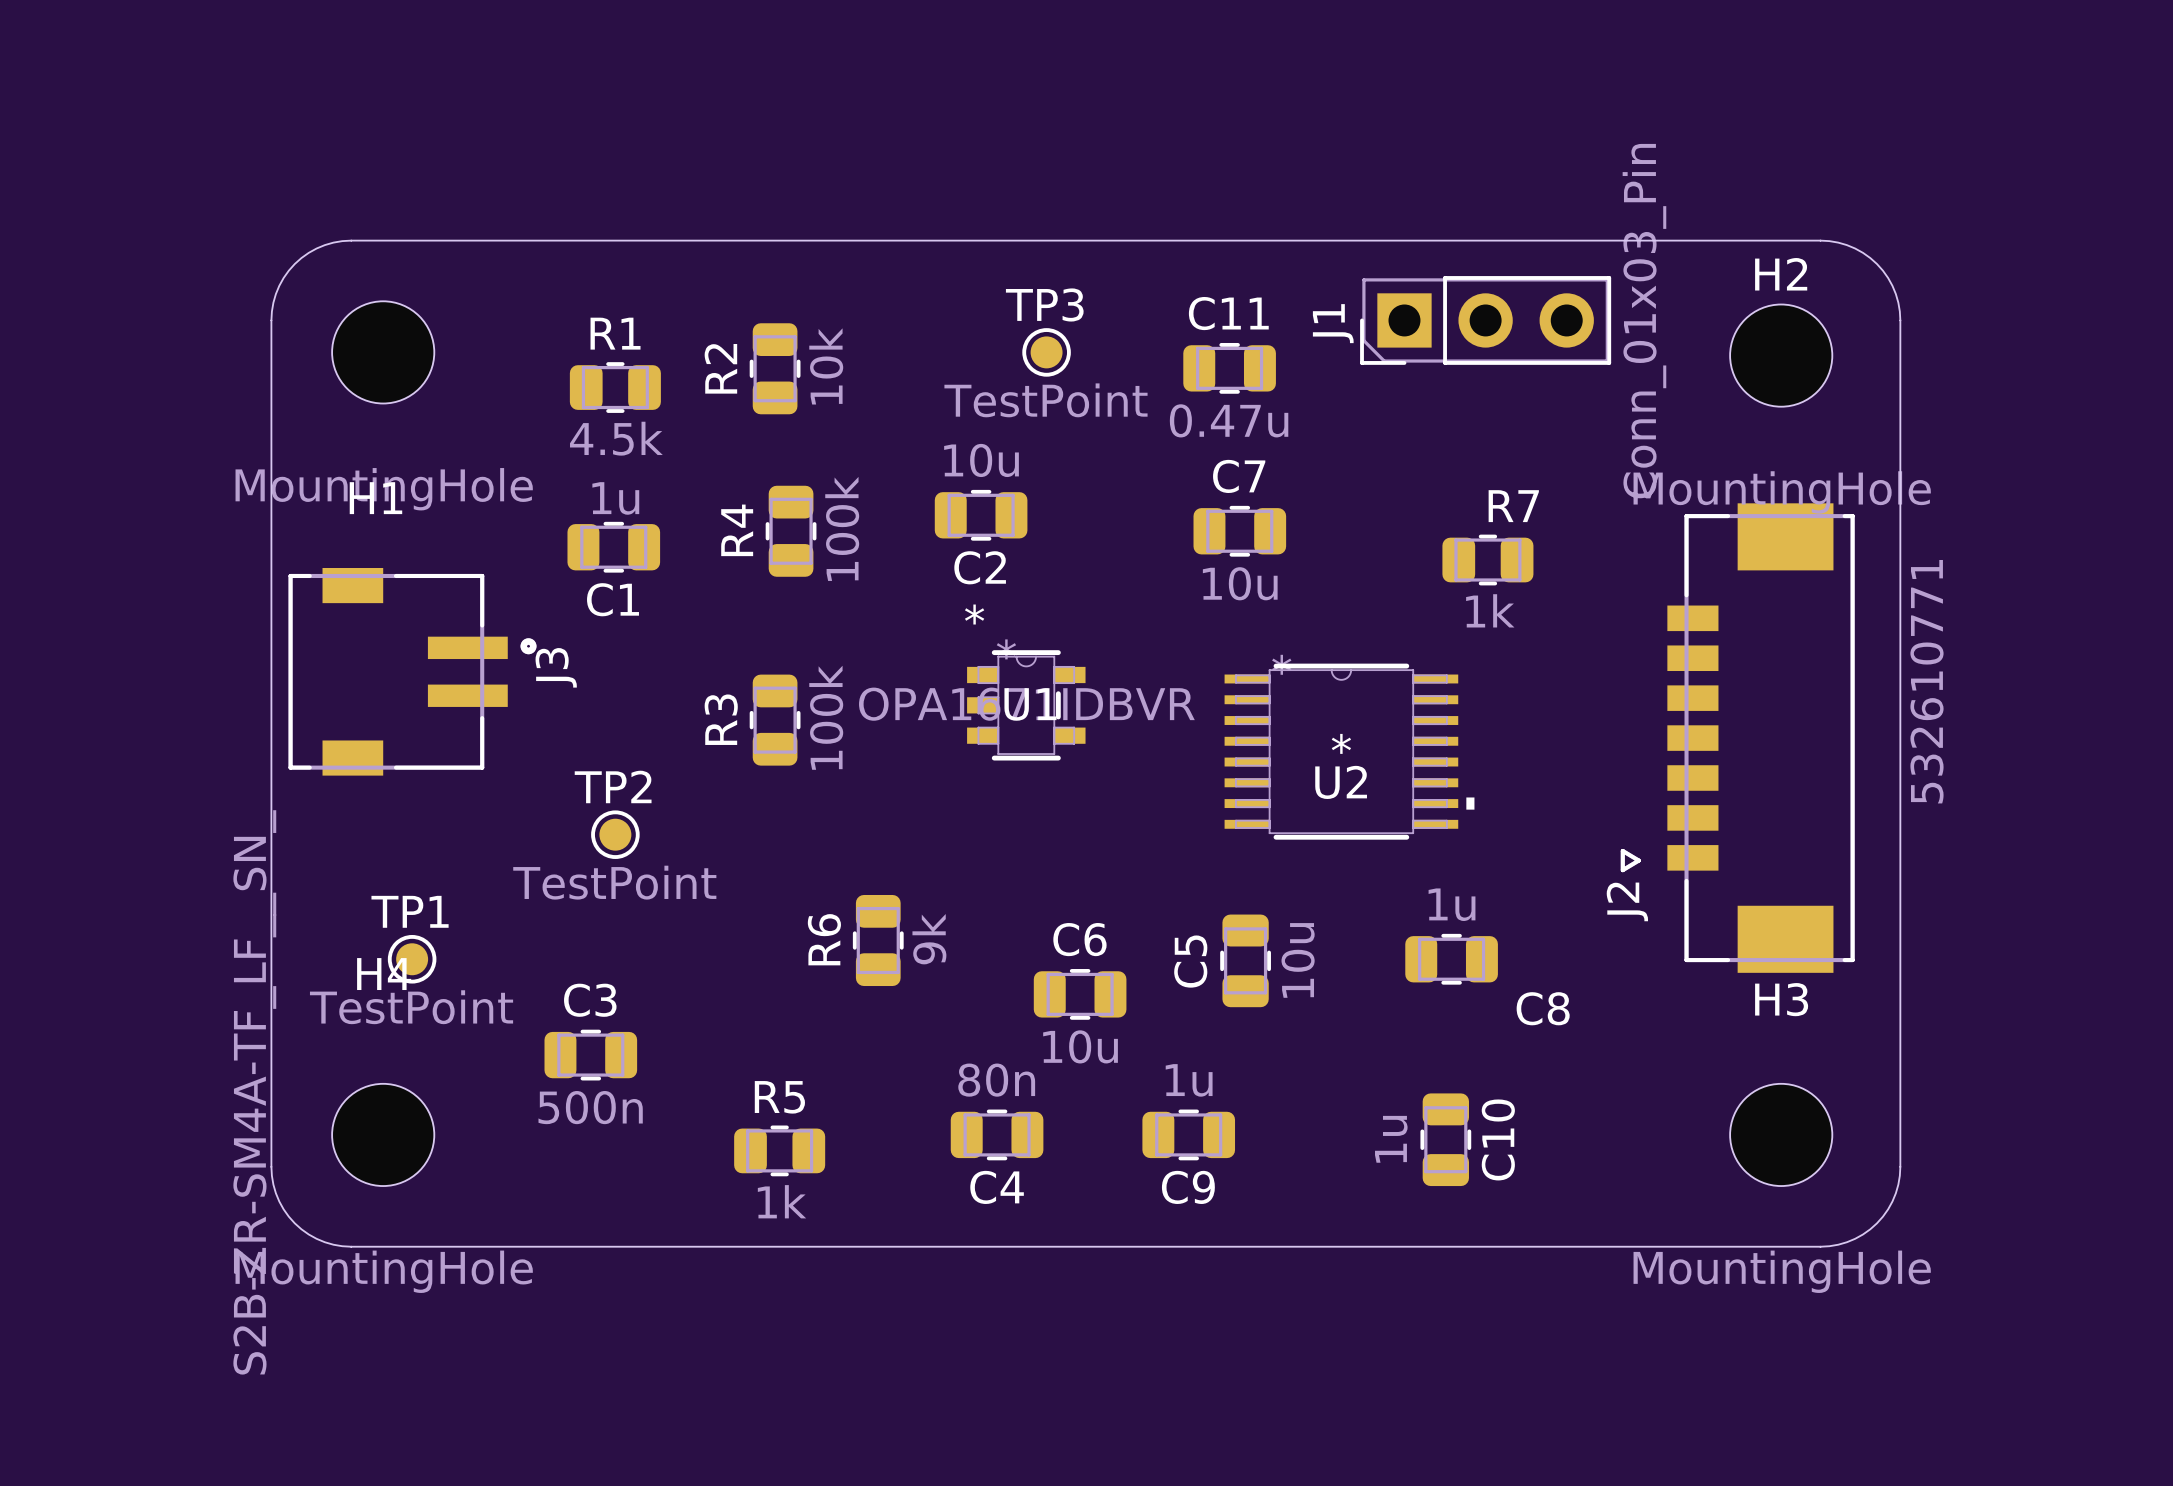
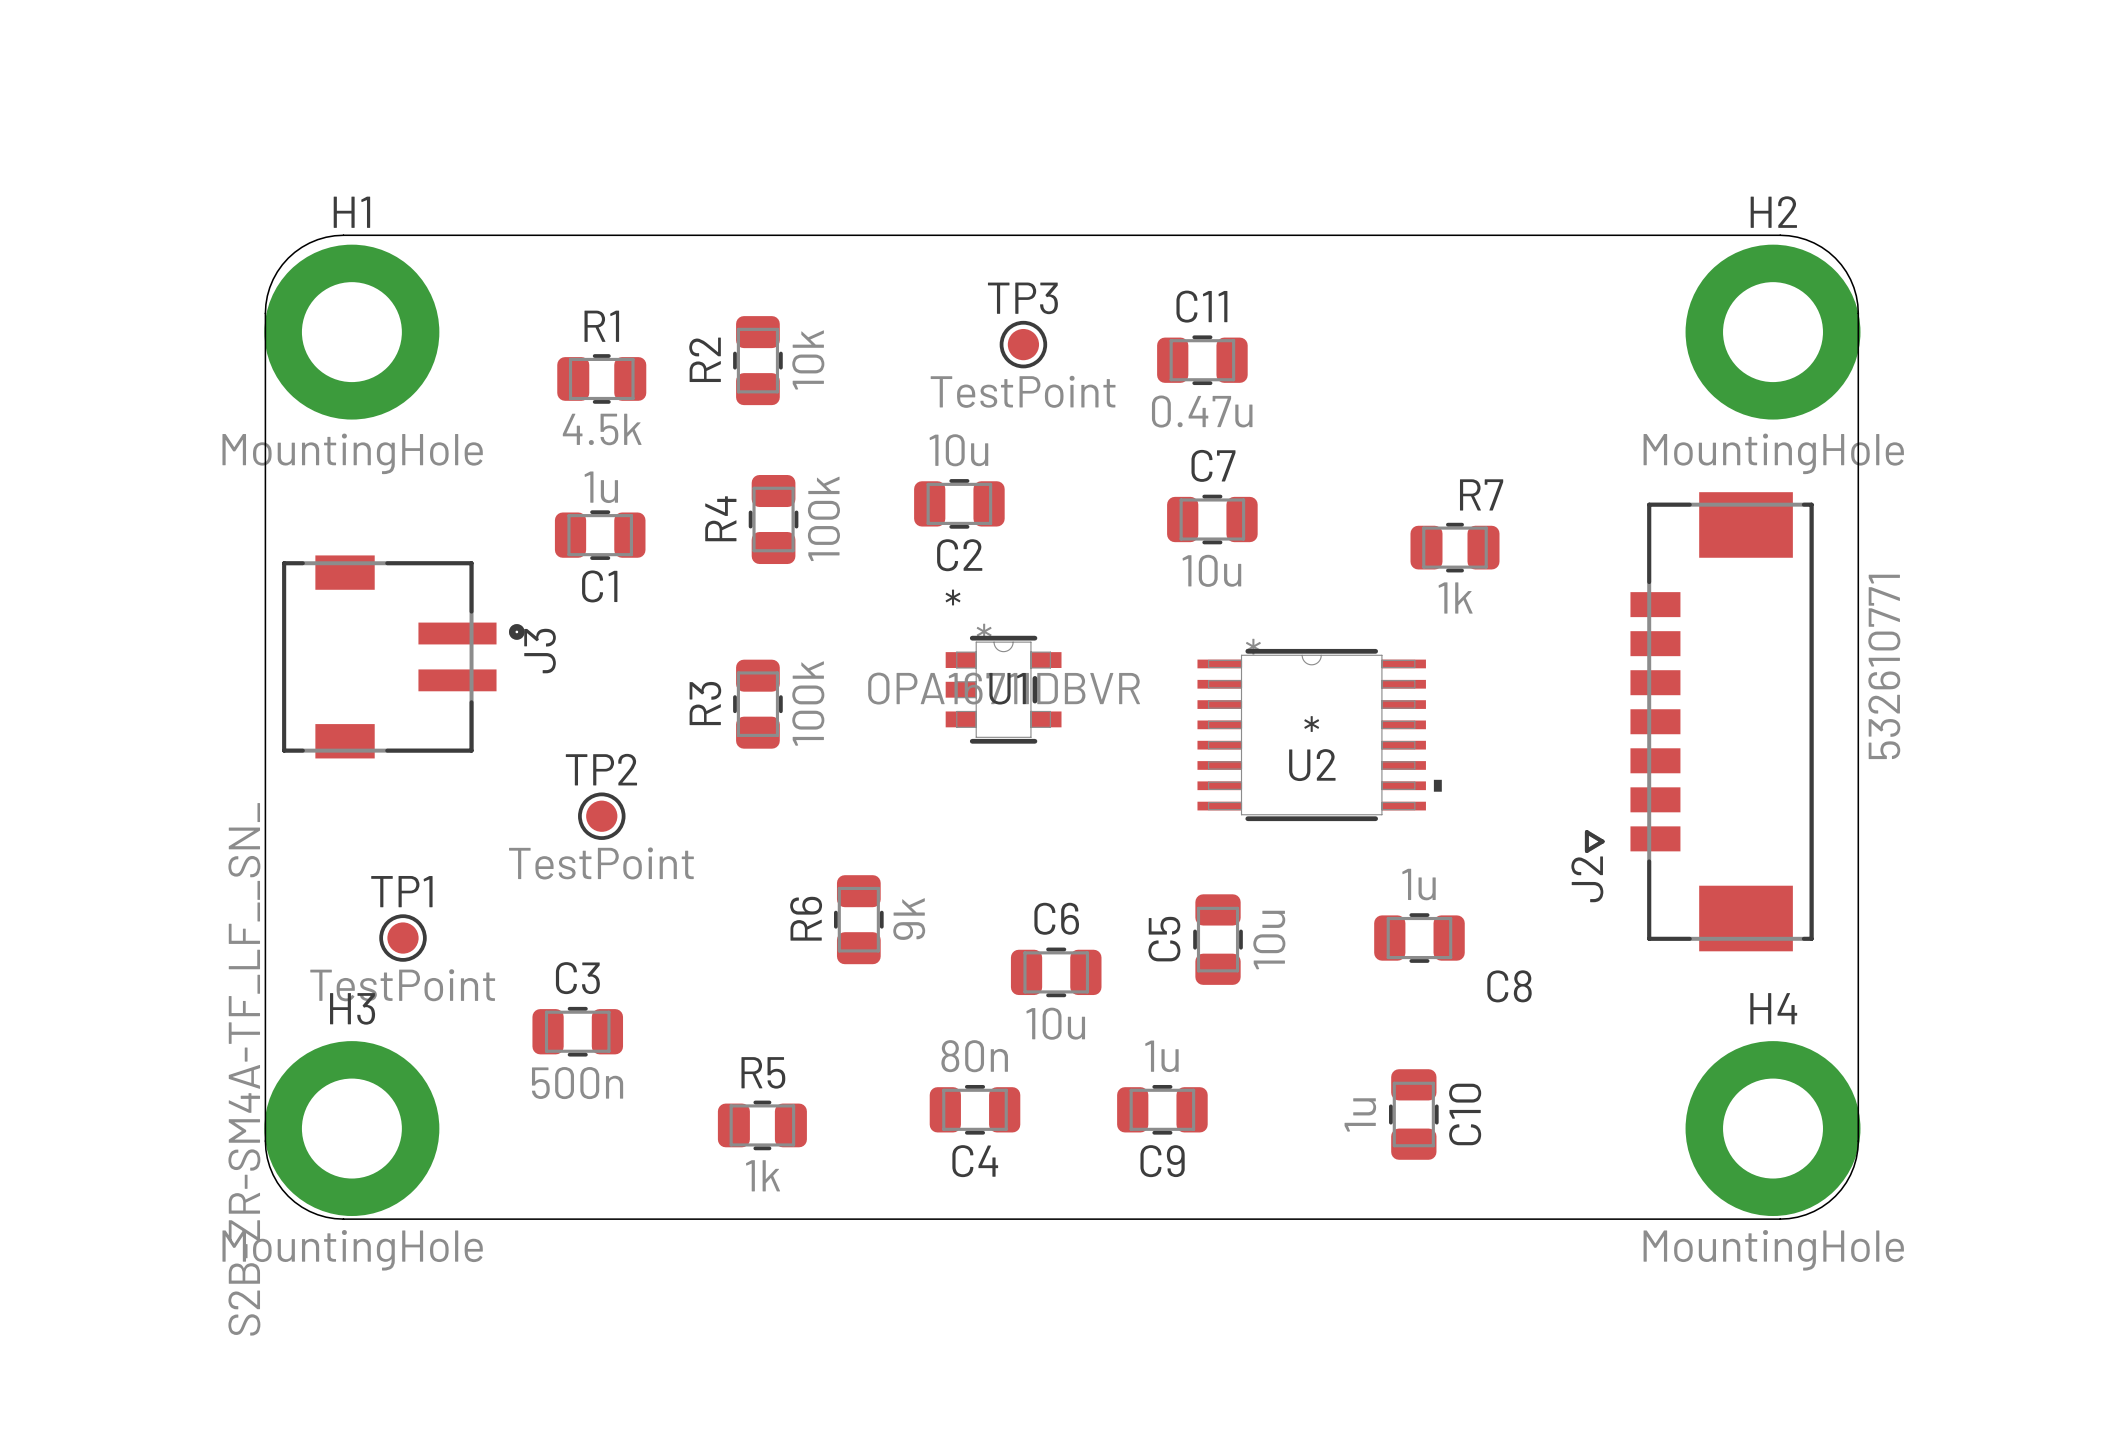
H1 footprint: [332, 301, 435, 404] -> [264, 244, 440, 420]
H2 footprint: [1730, 304, 1833, 407] -> [1685, 244, 1861, 420]
J1: Conn_01x03_Pin (1485, 320) -> none
H1 name position: H1 (375, 498) -> H1 (351, 212)
H4 footprint: [332, 1083, 435, 1187] -> [1685, 1041, 1861, 1217]
H3 footprint: [1730, 1083, 1833, 1187] -> [264, 1041, 440, 1217]

